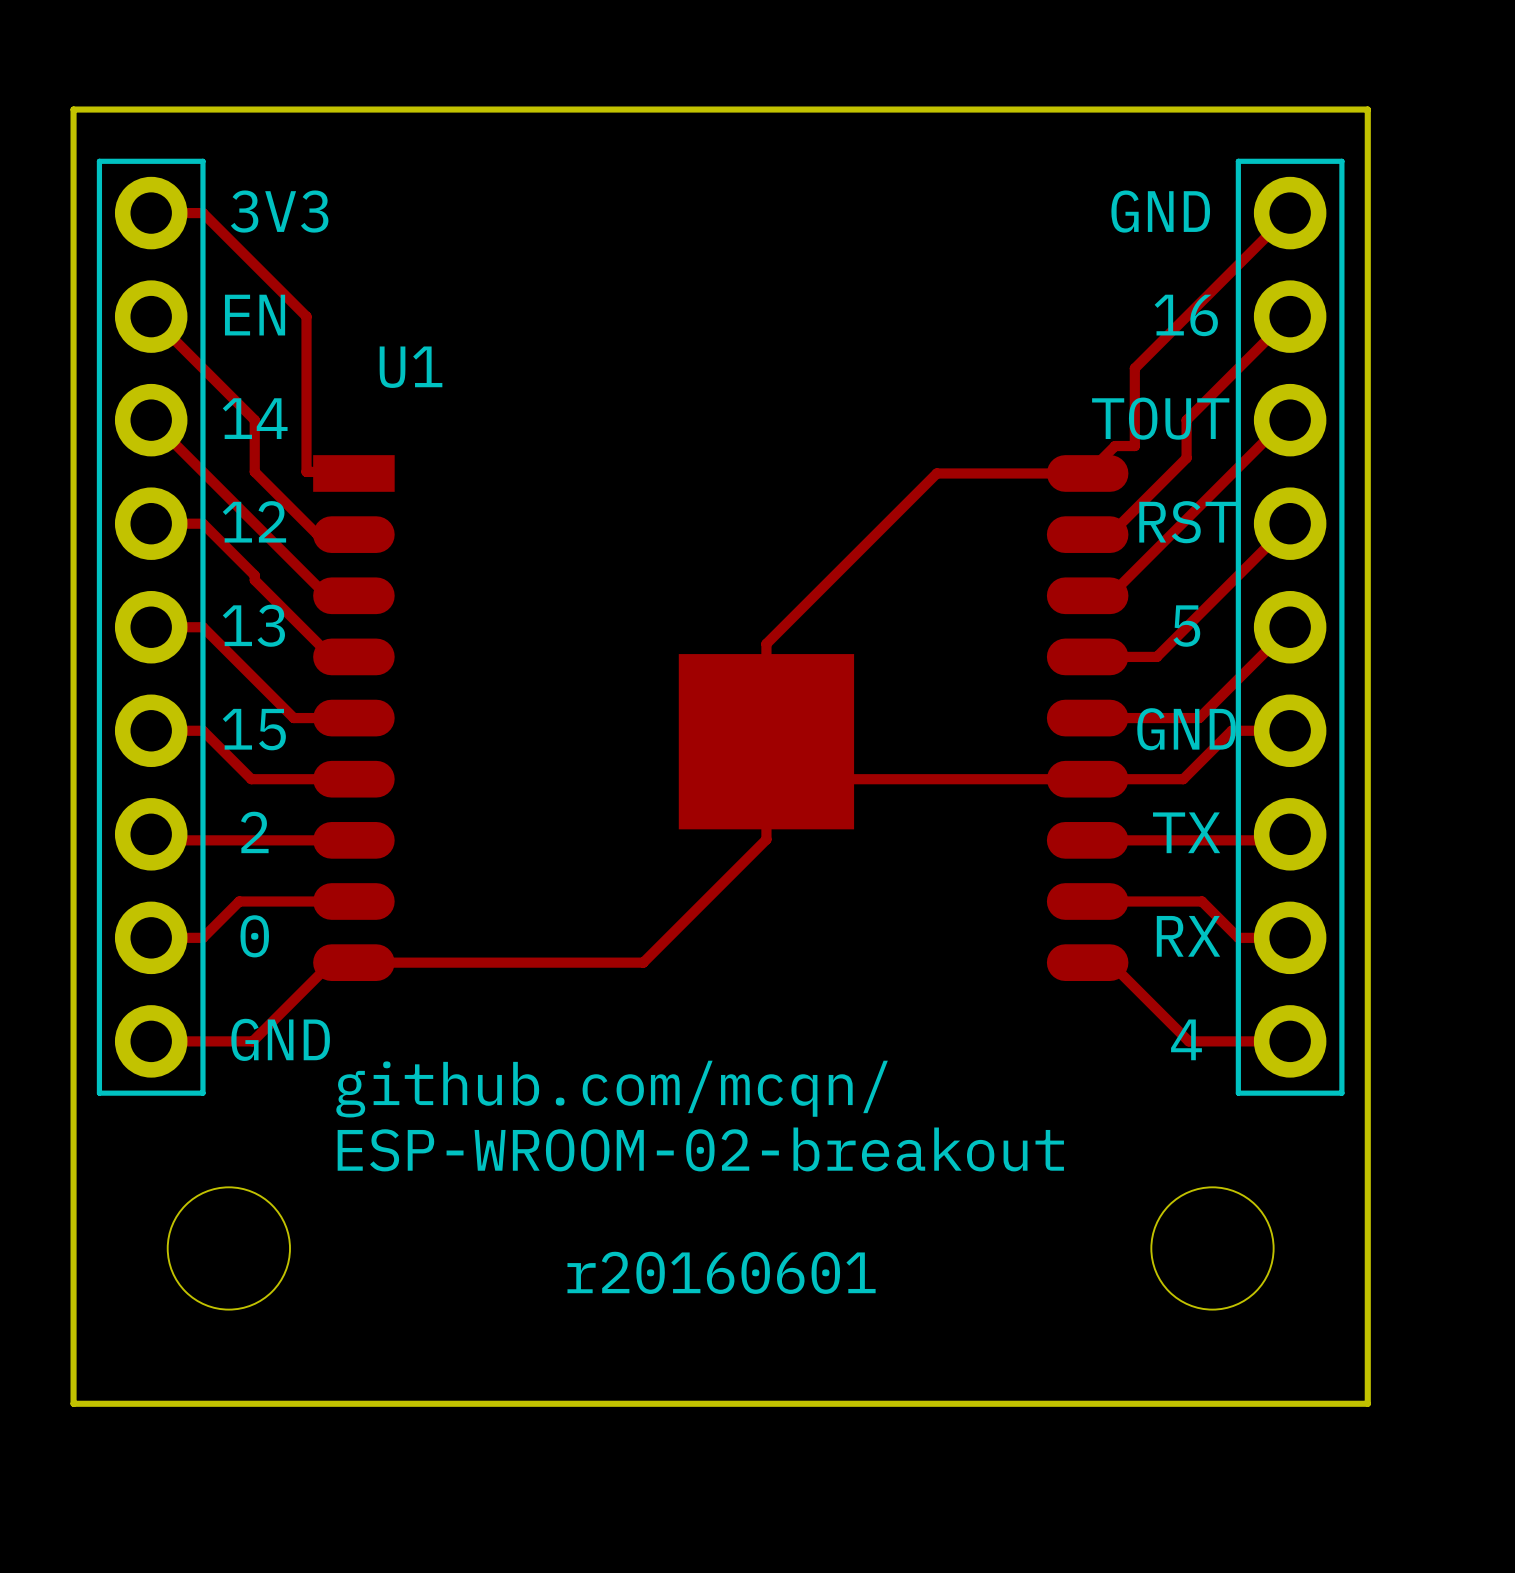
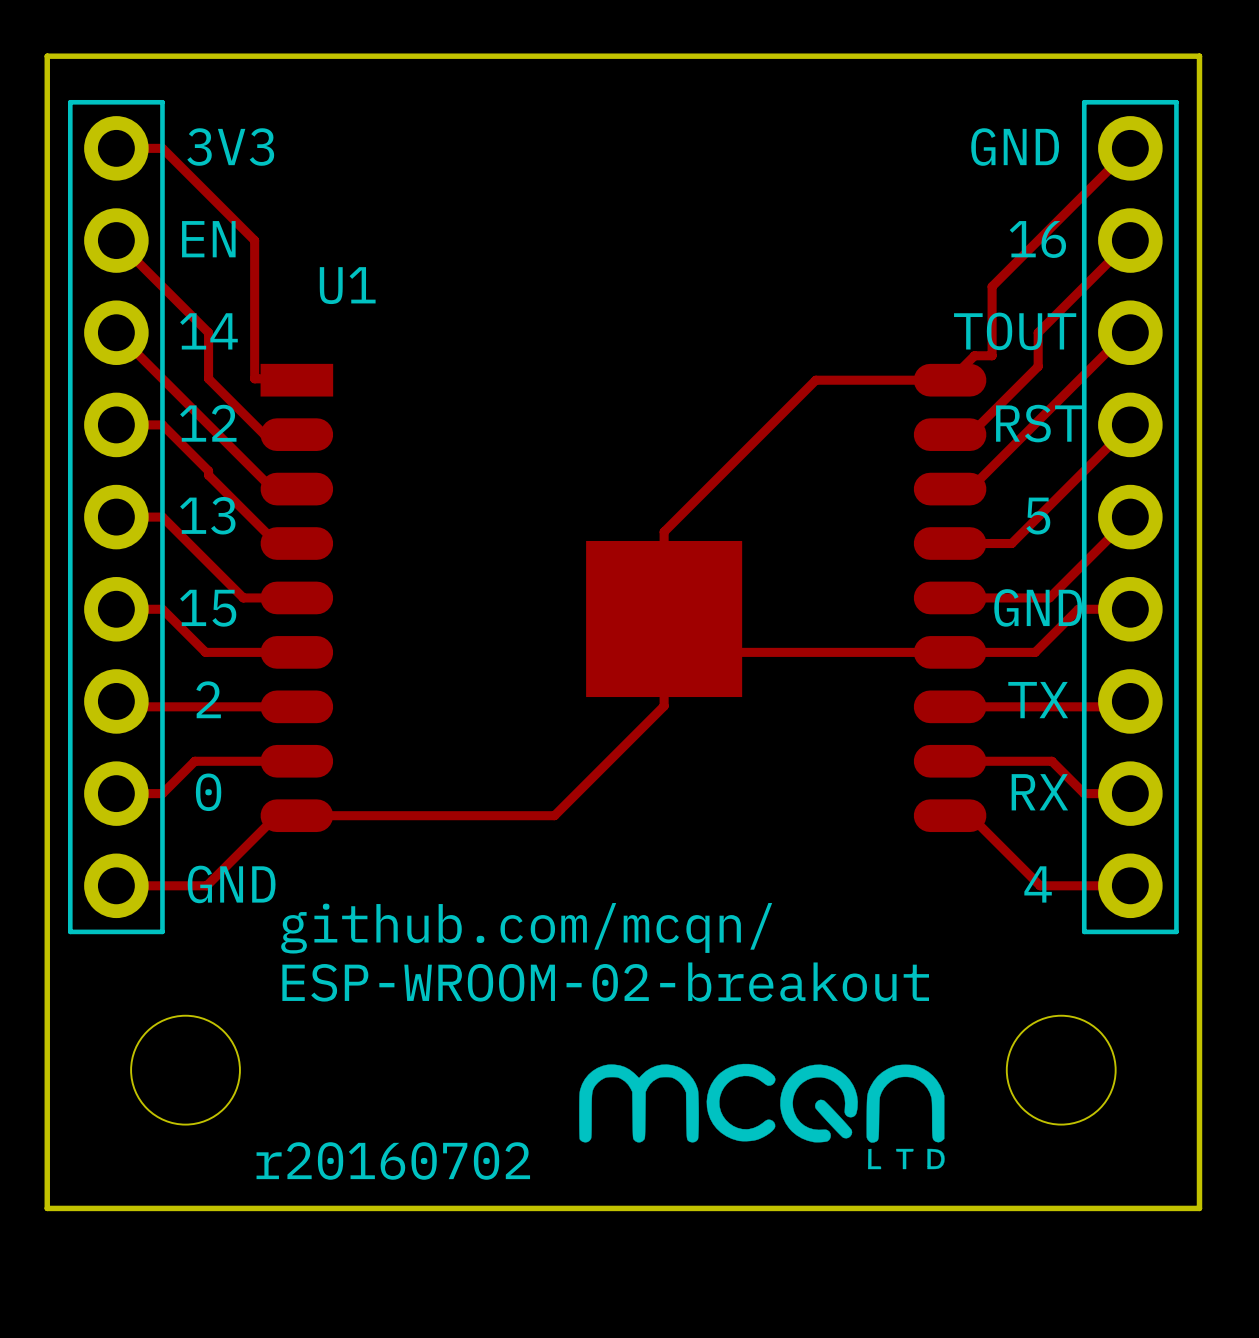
drawing: none -> [579, 1063, 945, 1170]
text: r20160601 (721, 1272) -> r20160702 (393, 1160)

